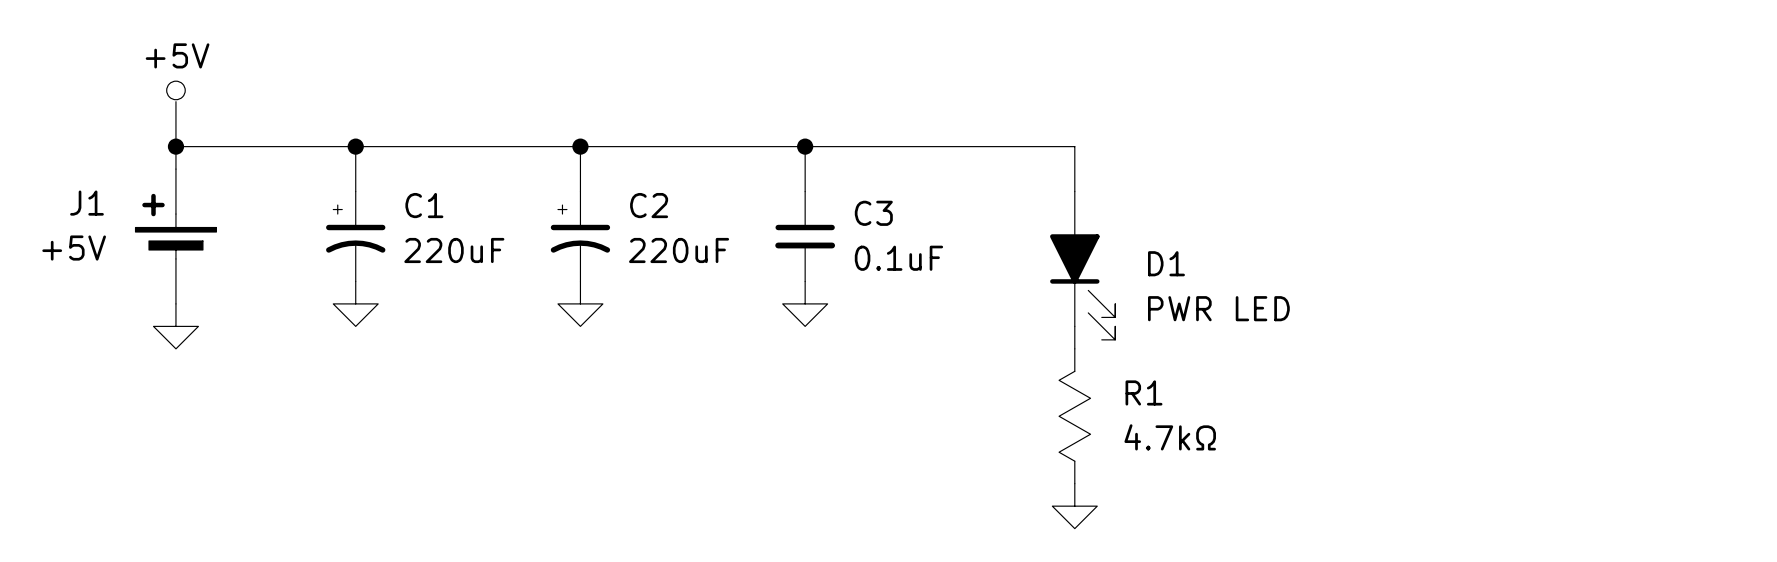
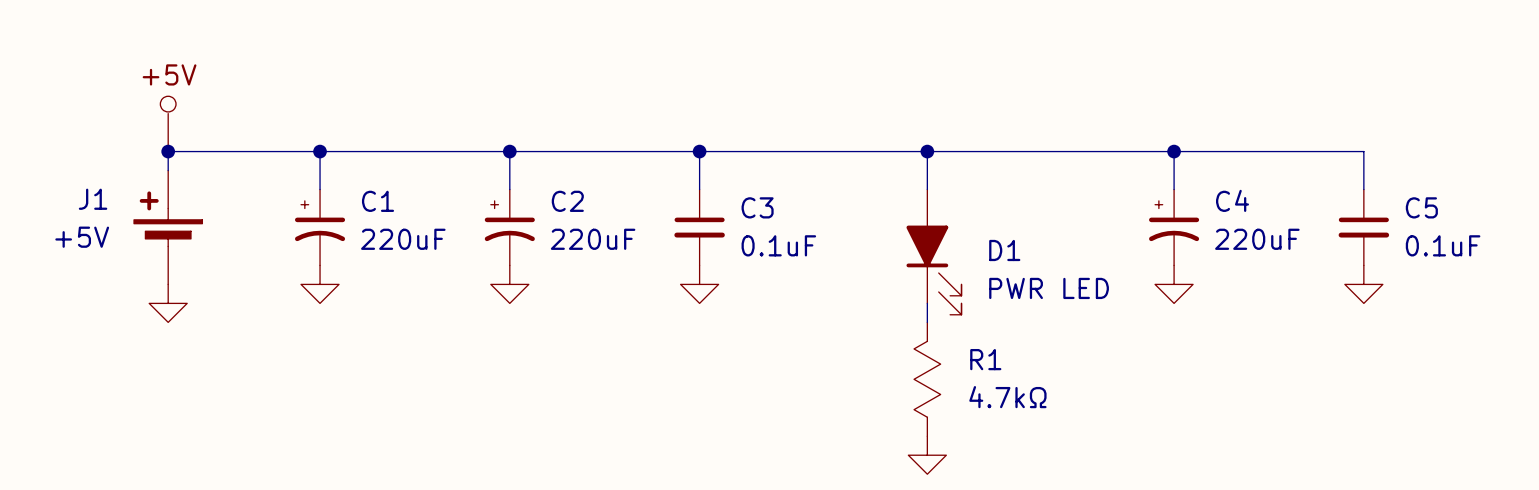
wire: none -> (927, 151) (1363, 151) (1363, 189)
junction: none -> (927, 151)
wire: none -> (1174, 151) (1174, 189)
junction: none -> (1174, 151)
C4: none -> 220uF (1174, 227)
C5: none -> 0.1uF (1363, 227)
power symbol: none -> (1174, 284)
power symbol: none -> (1363, 284)

